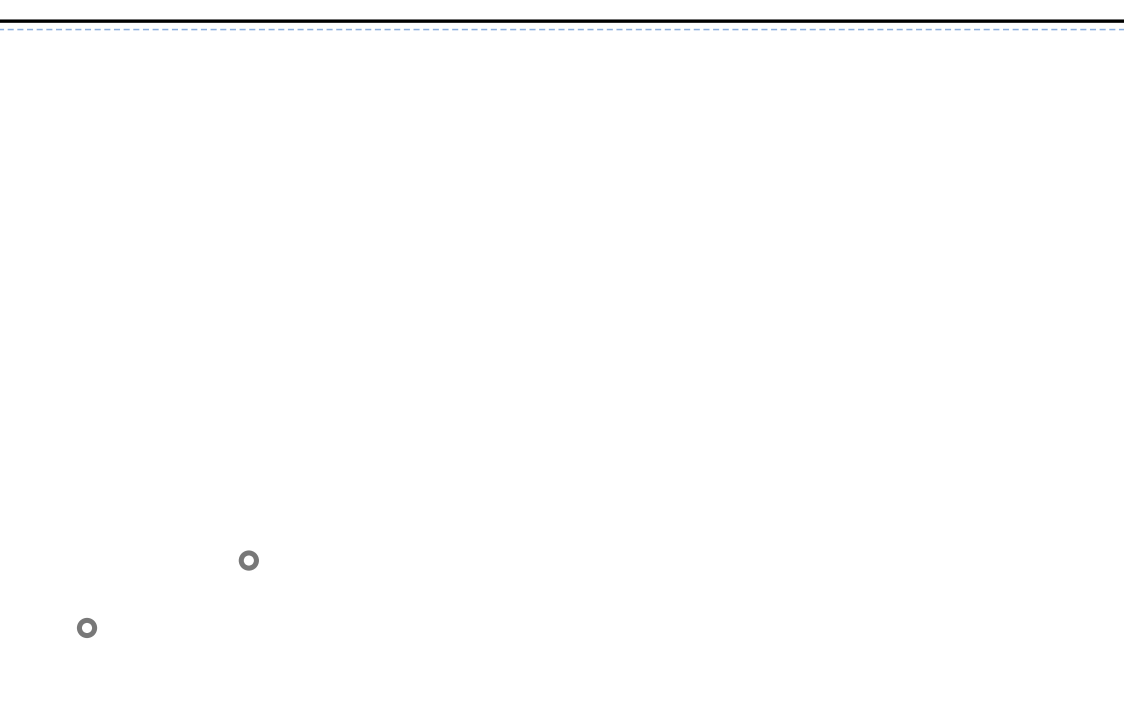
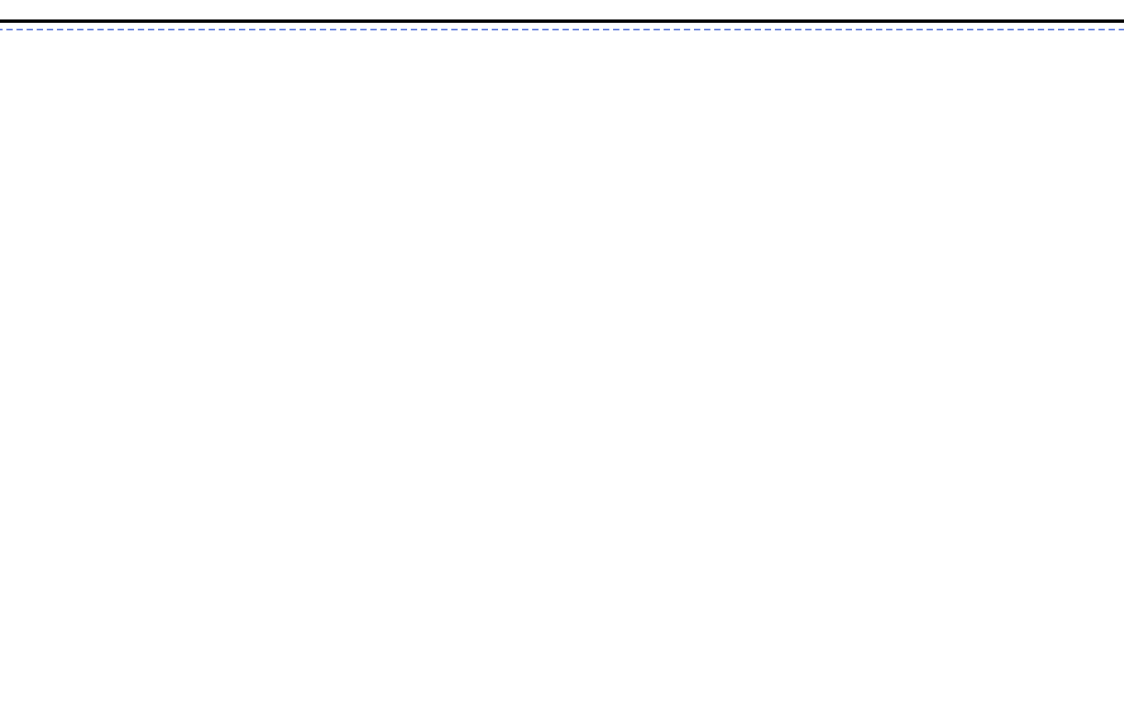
via: (248, 560) -> none
via: (87, 627) -> none

